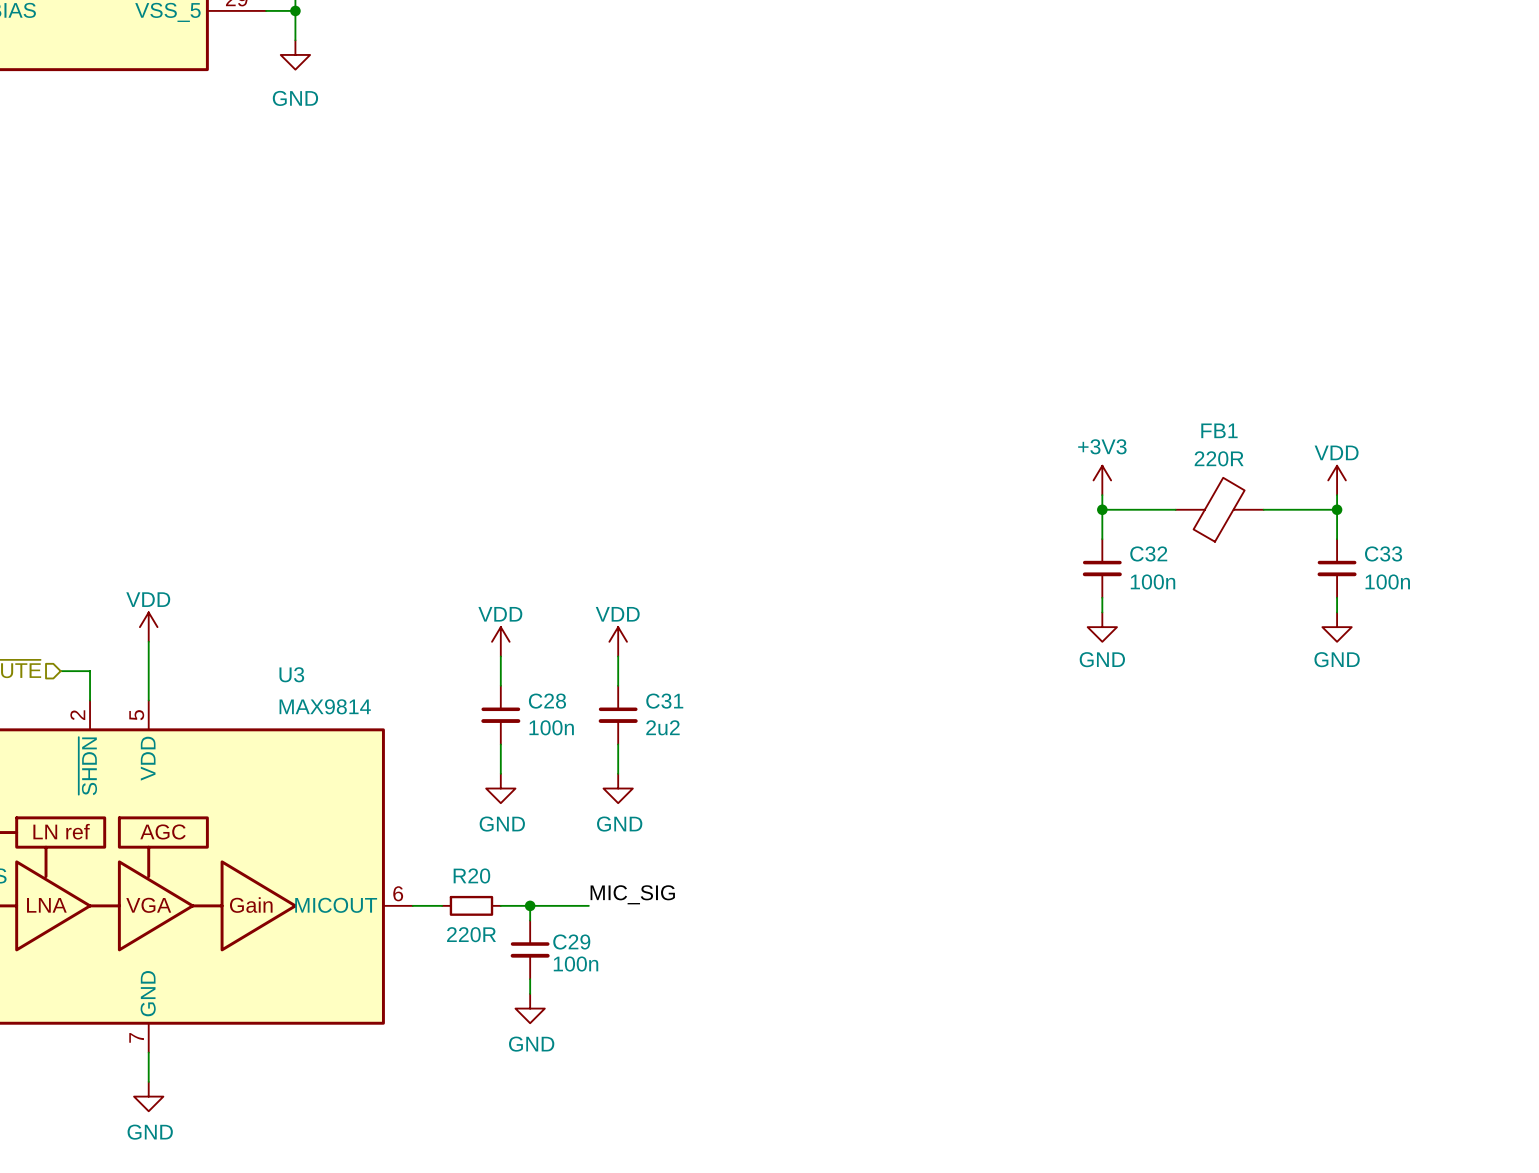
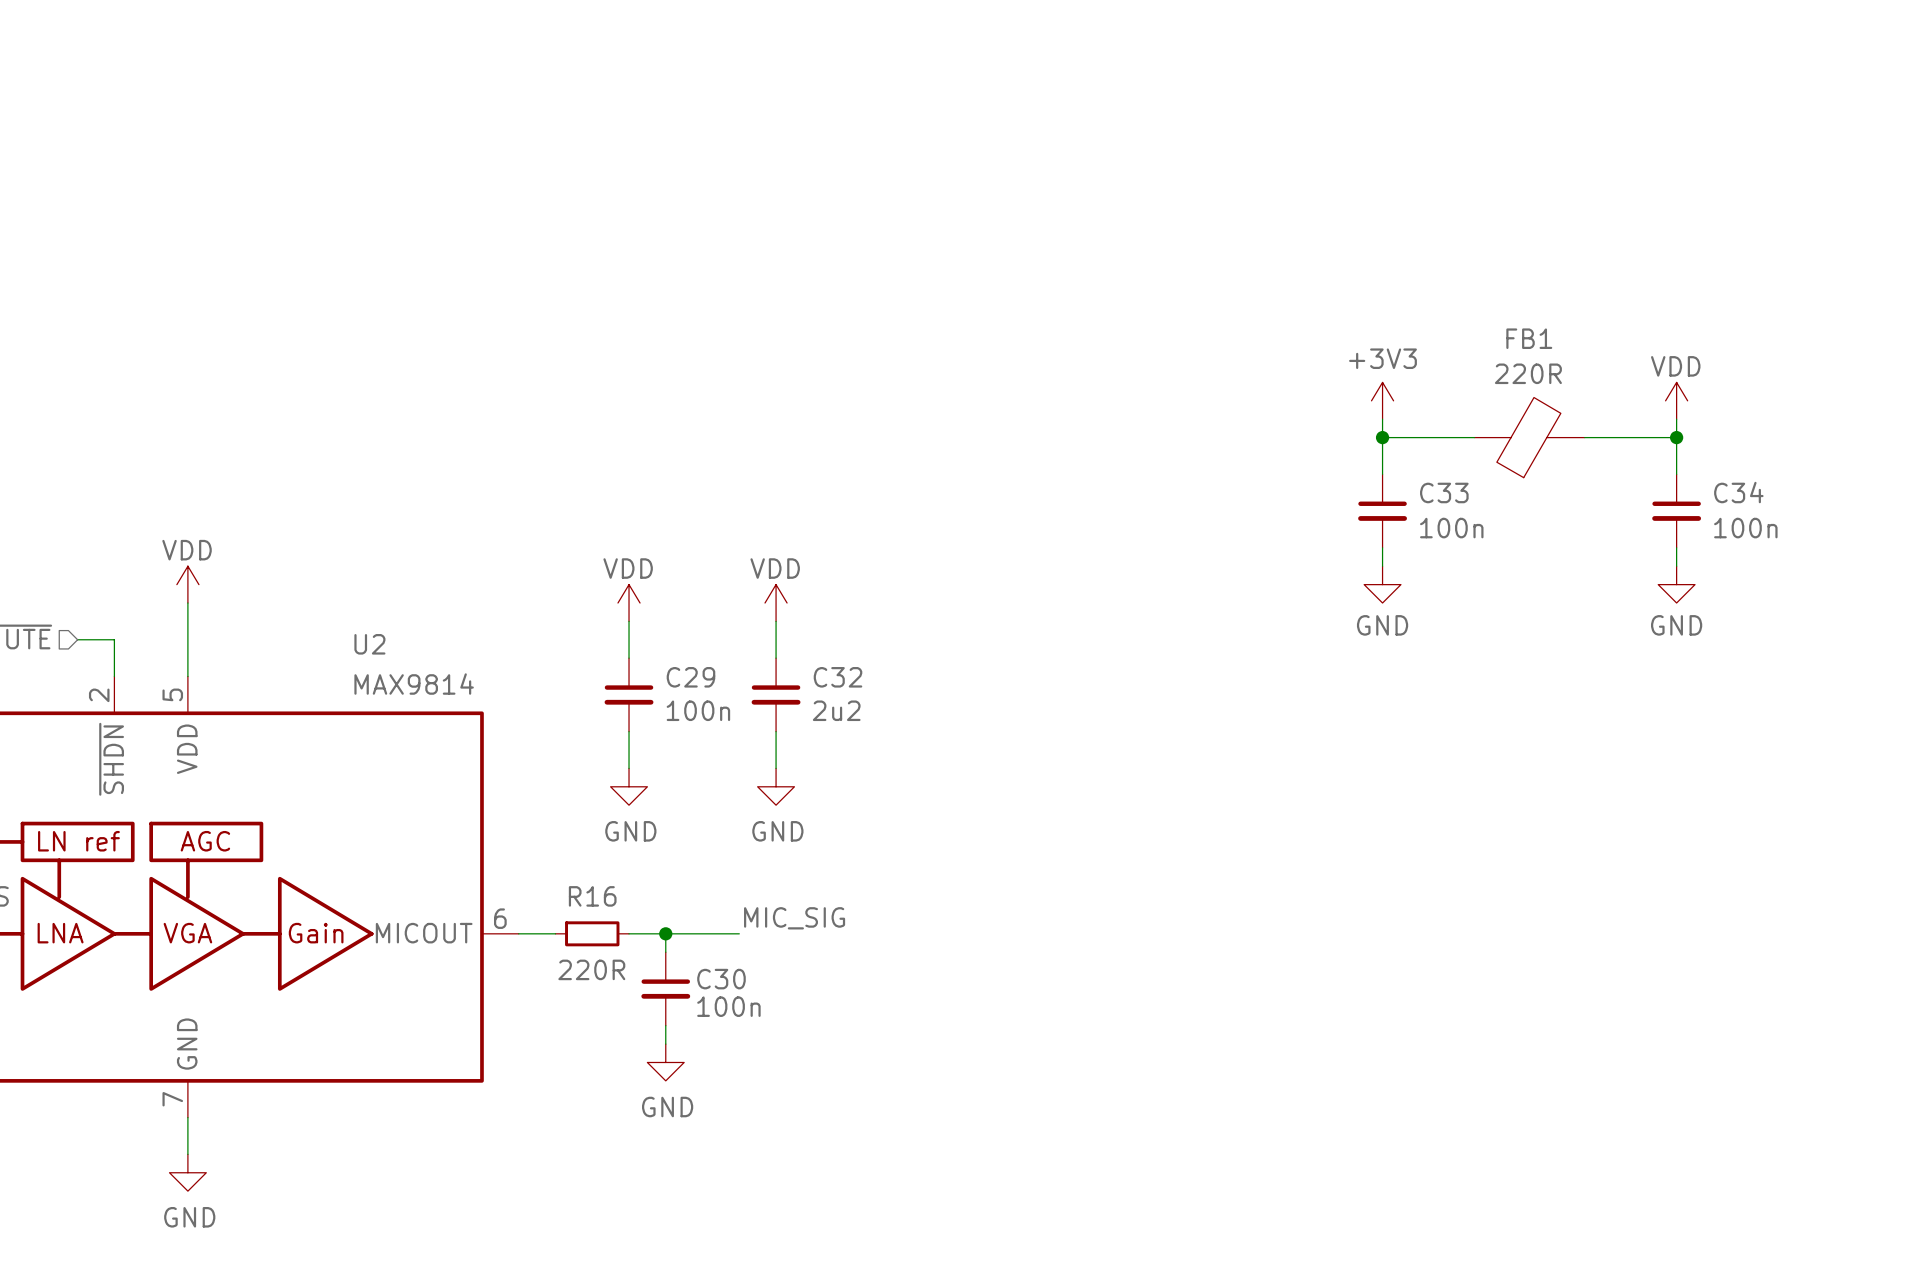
C32 name: C32 (1148, 553) -> C33 (1444, 492)
C33 name: C33 (1383, 553) -> C34 (1738, 492)
U3 name: U3 (291, 674) -> U2 (369, 644)
C28 name: C28 (547, 701) -> C29 (690, 677)
C31 name: C31 (664, 701) -> C32 (838, 677)
R20 name: R20 (471, 875) -> R16 (592, 896)
C29 name: C29 (571, 942) -> C30 (721, 979)

